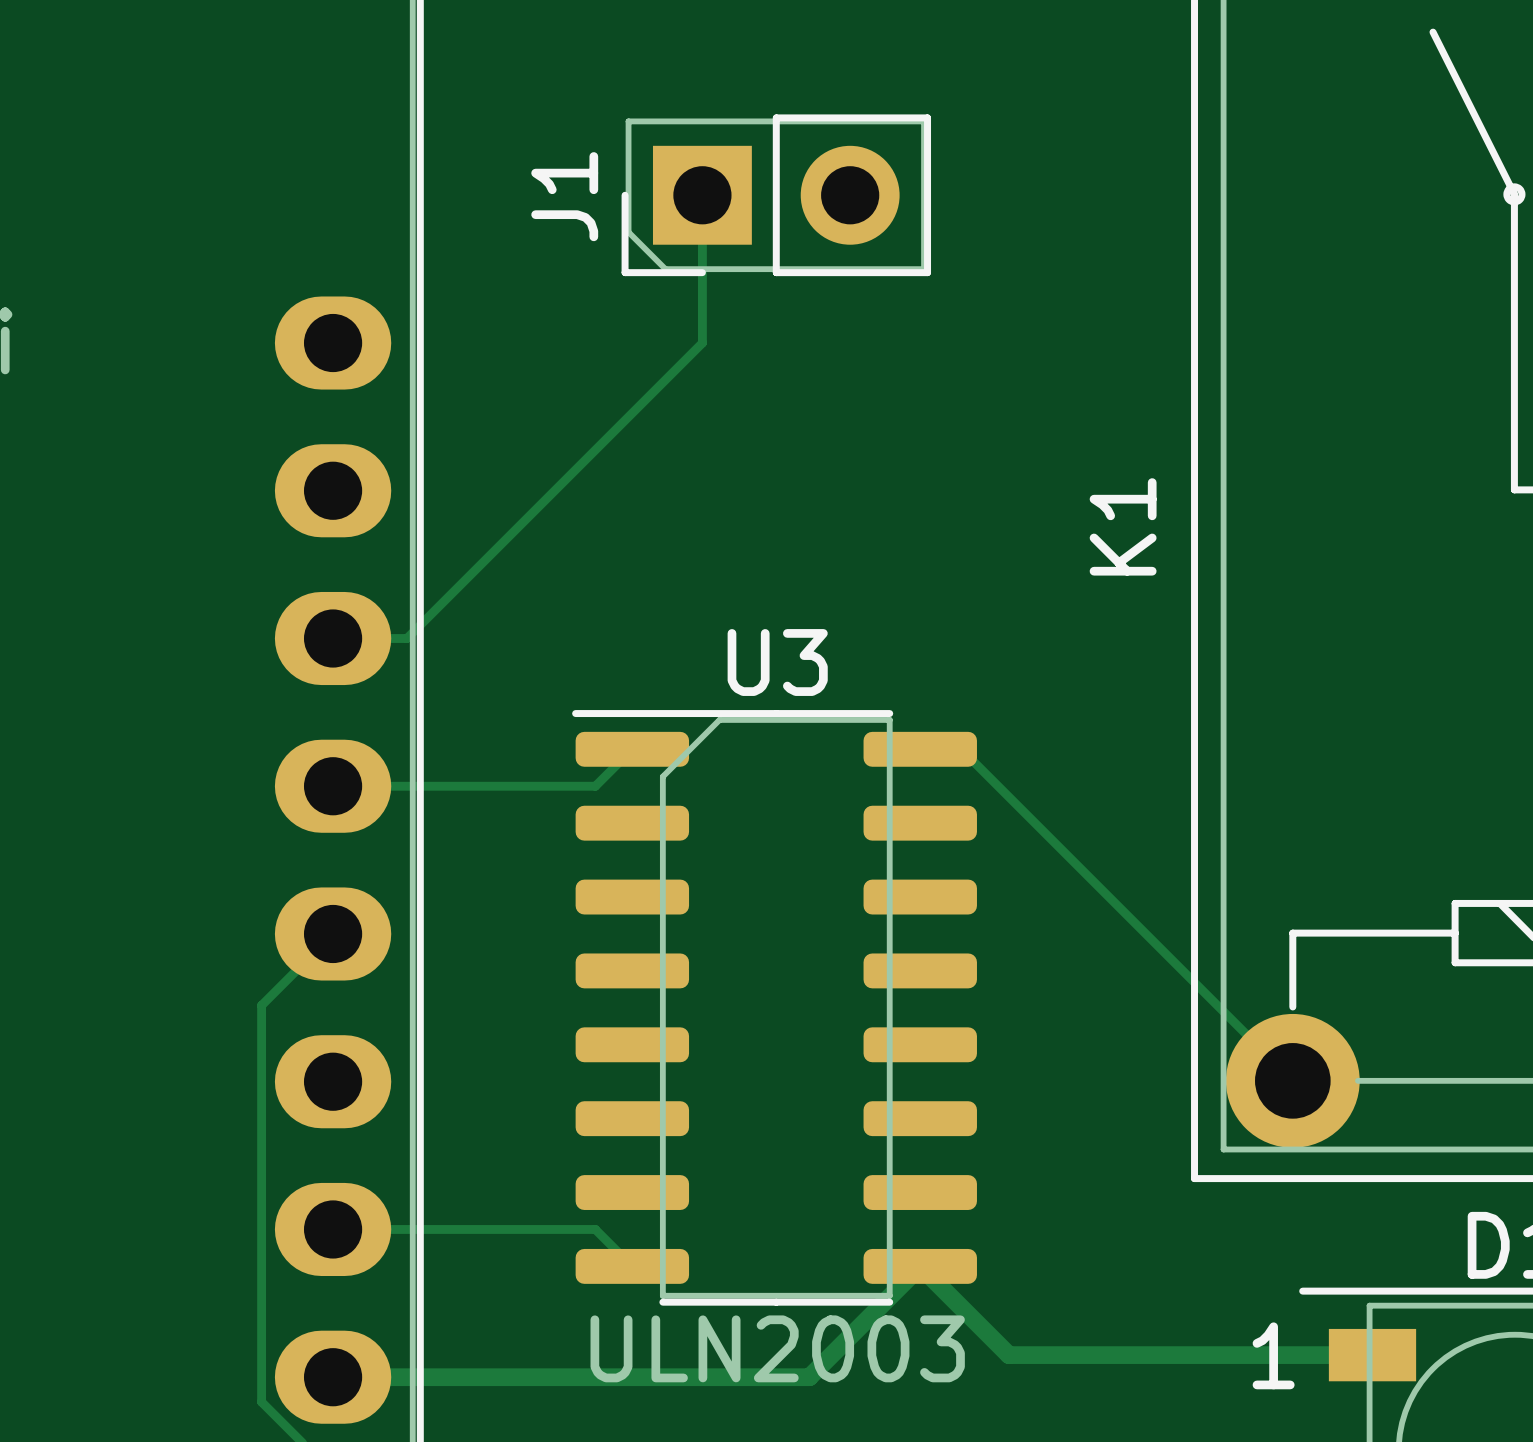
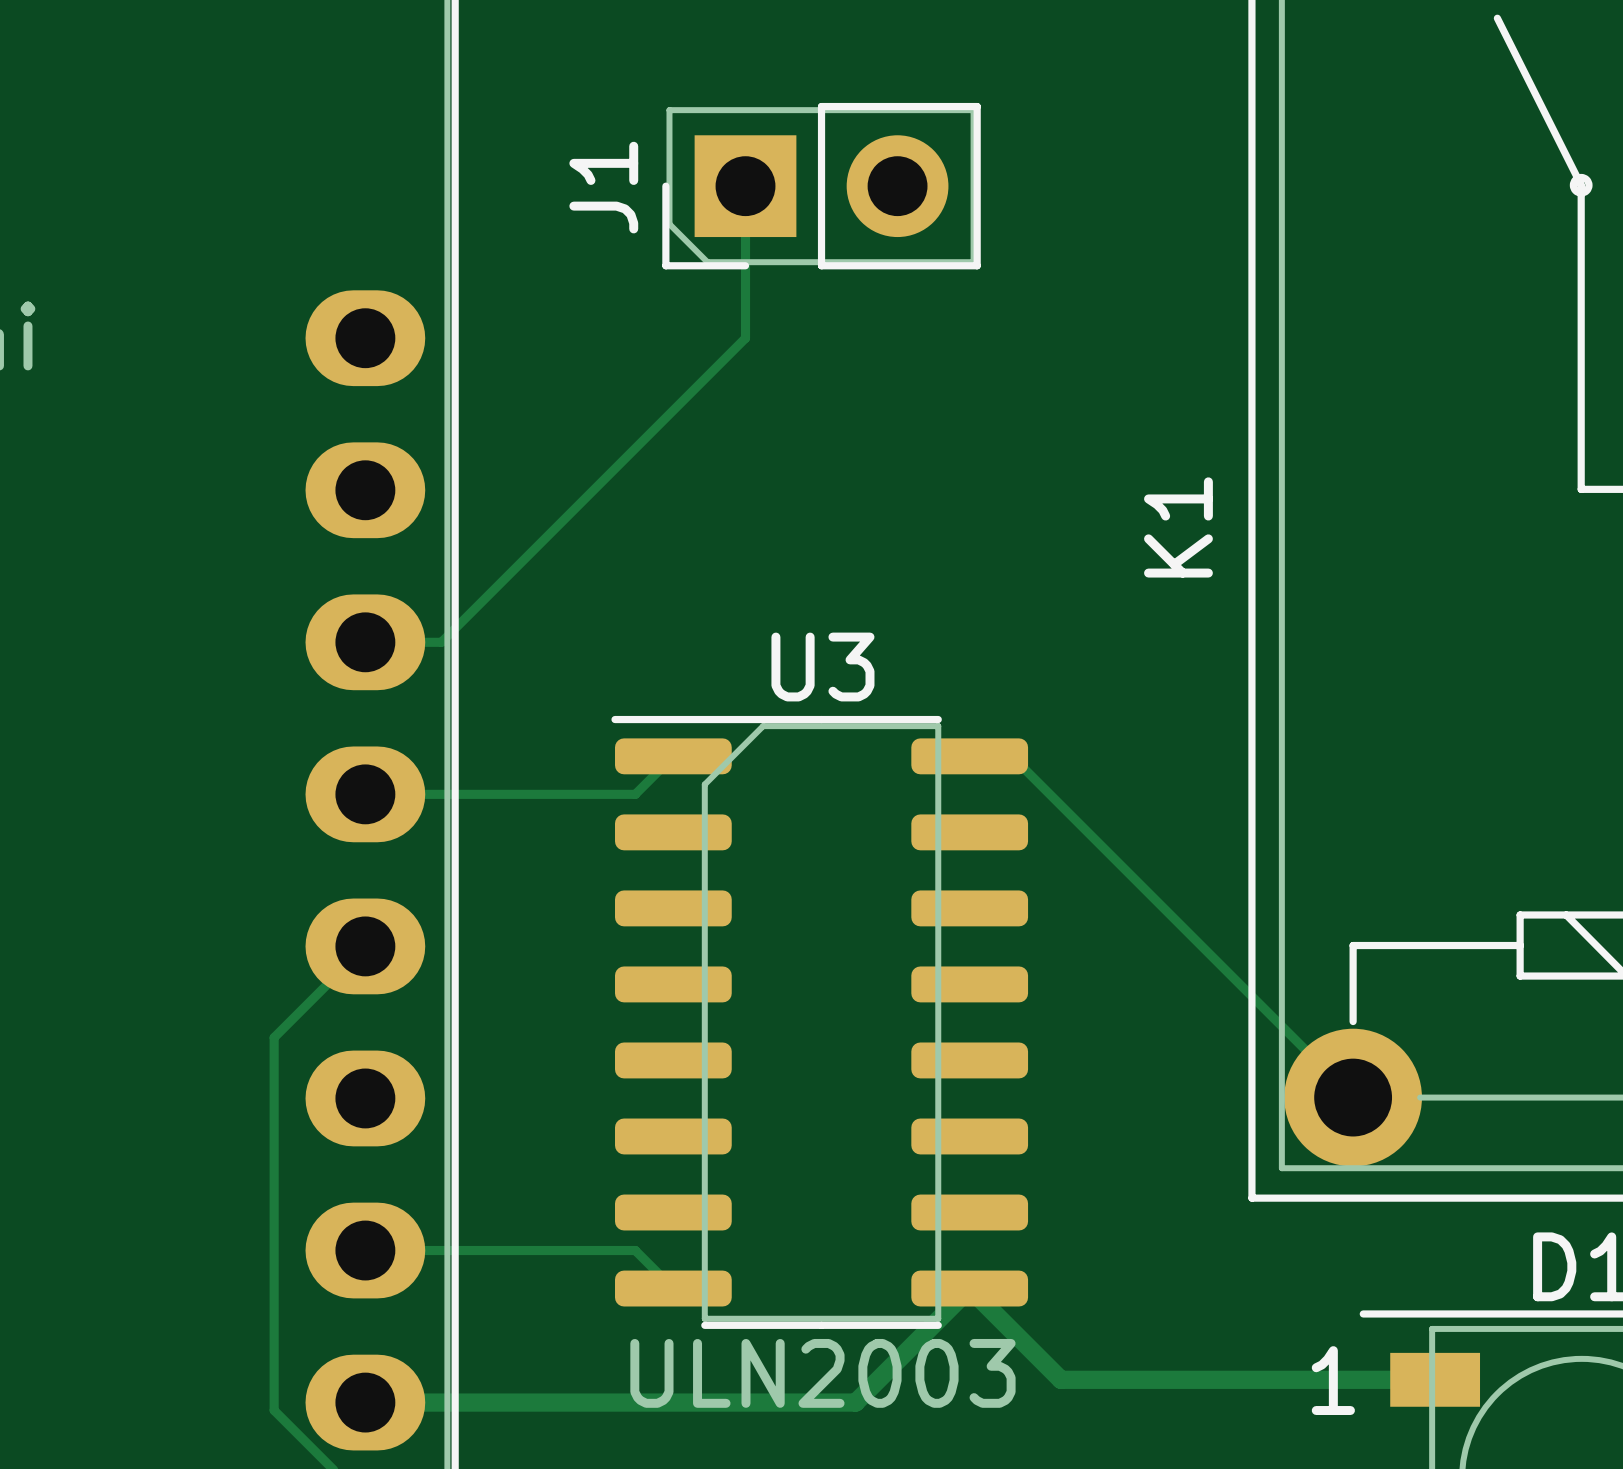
track: (261, 1005) (261, 1401) -> (291, 1019) (274, 1037) (274, 1410) (291, 1428)

